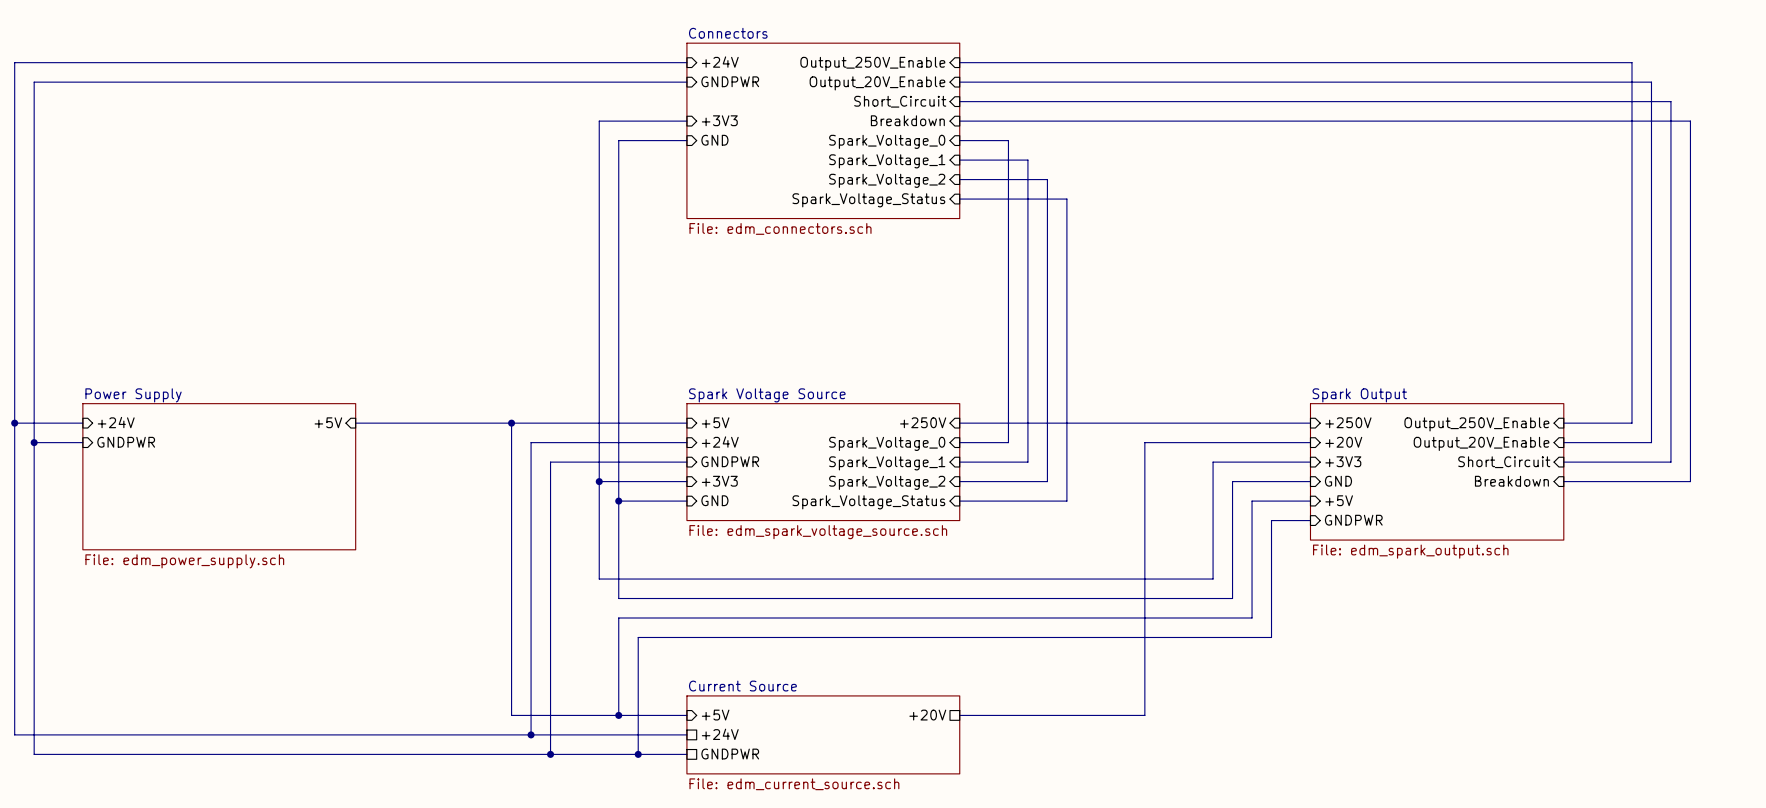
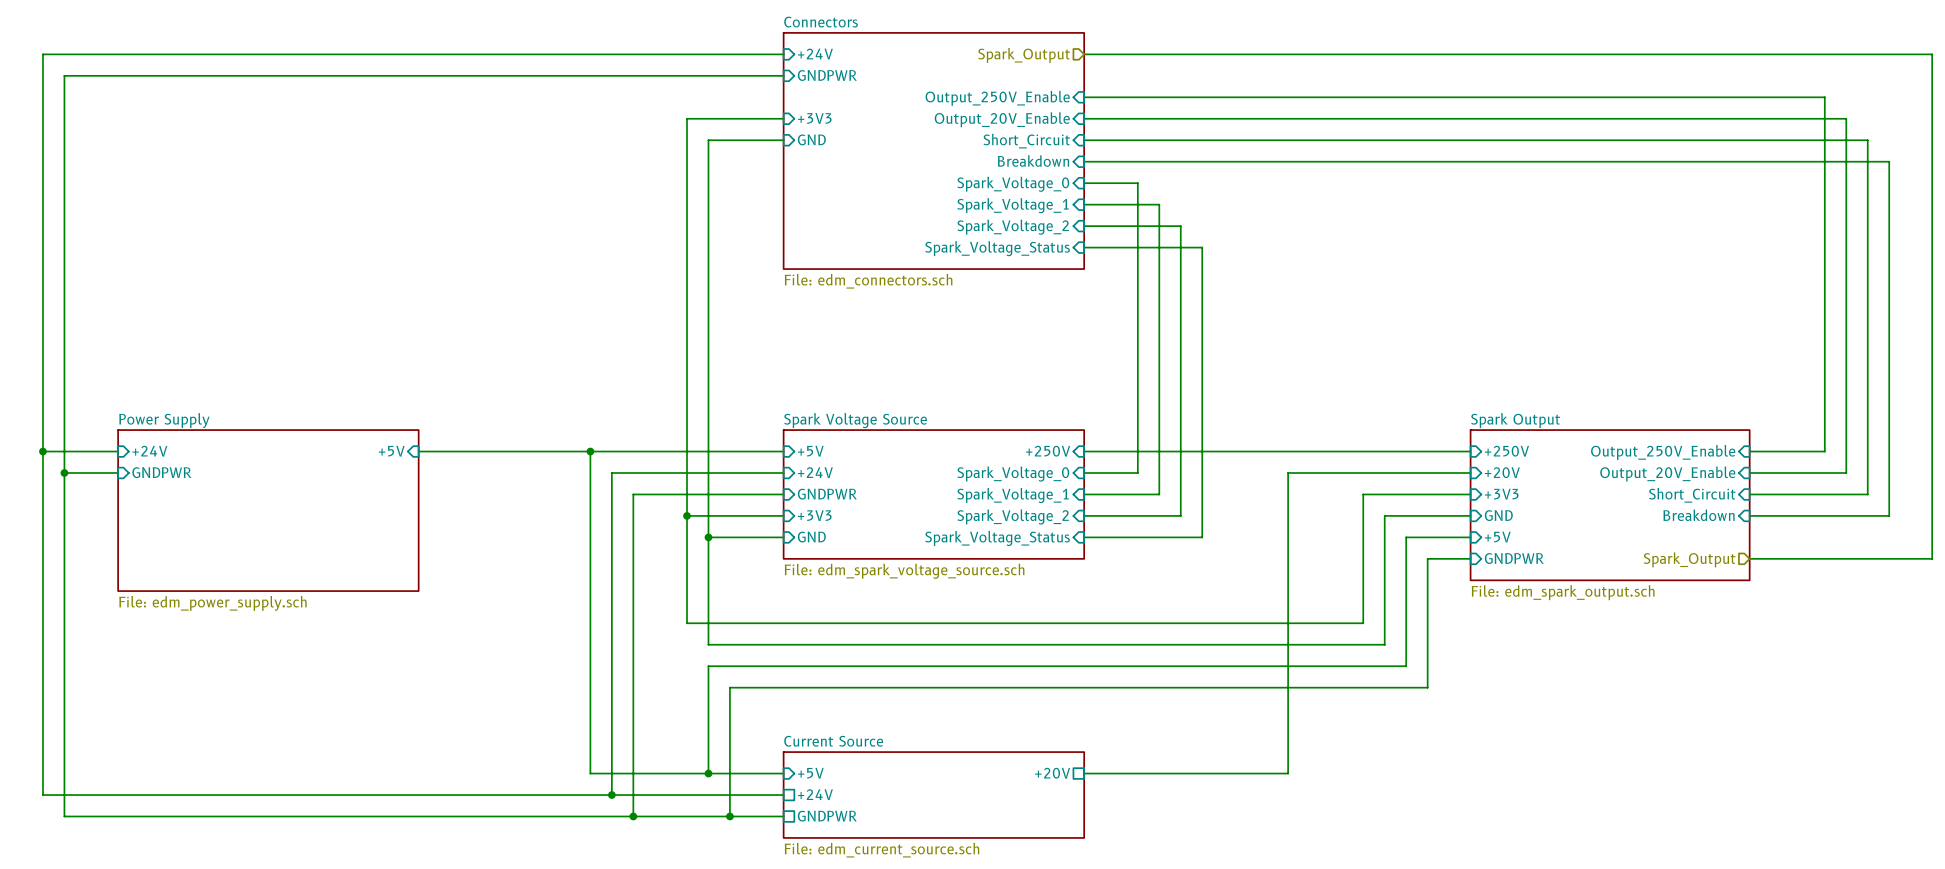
wire: (1631, 62) (1631, 101) (1670, 101) (1670, 140) -> (1824, 54) (1932, 54) (1932, 558) (1749, 558)
sheet pin: Output_250V_Enable (872, 63) -> none
hierarchical label: none -> Spark_Output (1024, 55)
wire: (959, 82) (1651, 82) (1651, 121) (1690, 121) (1690, 160) -> (1159, 161) (1889, 161)
sheet pin: Output_20V_Enable (877, 83) -> none
sheet pin: Short_Circuit (900, 101) -> Output_250V_Enable (997, 98)
sheet pin: Breakdown (907, 120) -> Output_20V_Enable (1002, 119)
sheet Connectors: File: edm_connectors.sch (823, 130) -> none
wire: (1008, 140) (1008, 179) (1047, 179) (1047, 218) -> (1084, 226) (1180, 226)
wire: none -> (1137, 140) (1867, 140)
sheet pin: Spark_Voltage_0 (887, 141) -> Short_Circuit (1026, 141)
sheet Connectors: none -> File: edm_connectors.sch (933, 150)
wire: (1027, 160) (1027, 199) (1066, 199) (1066, 238) -> (1084, 247) (1202, 247)
sheet pin: Spark_Voltage_1 (887, 161) -> Breakdown (1033, 161)
sheet pin: Spark_Voltage_2 (887, 180) -> Spark_Voltage_0 (1013, 184)
sheet pin: Spark_Voltage_Status (868, 200) -> Spark_Voltage_1 (1013, 205)
sheet pin: none -> Spark_Voltage_2 (1013, 227)
sheet pin: none -> Spark_Voltage_Status (997, 248)
hierarchical label: none -> Spark_Output (1689, 559)

